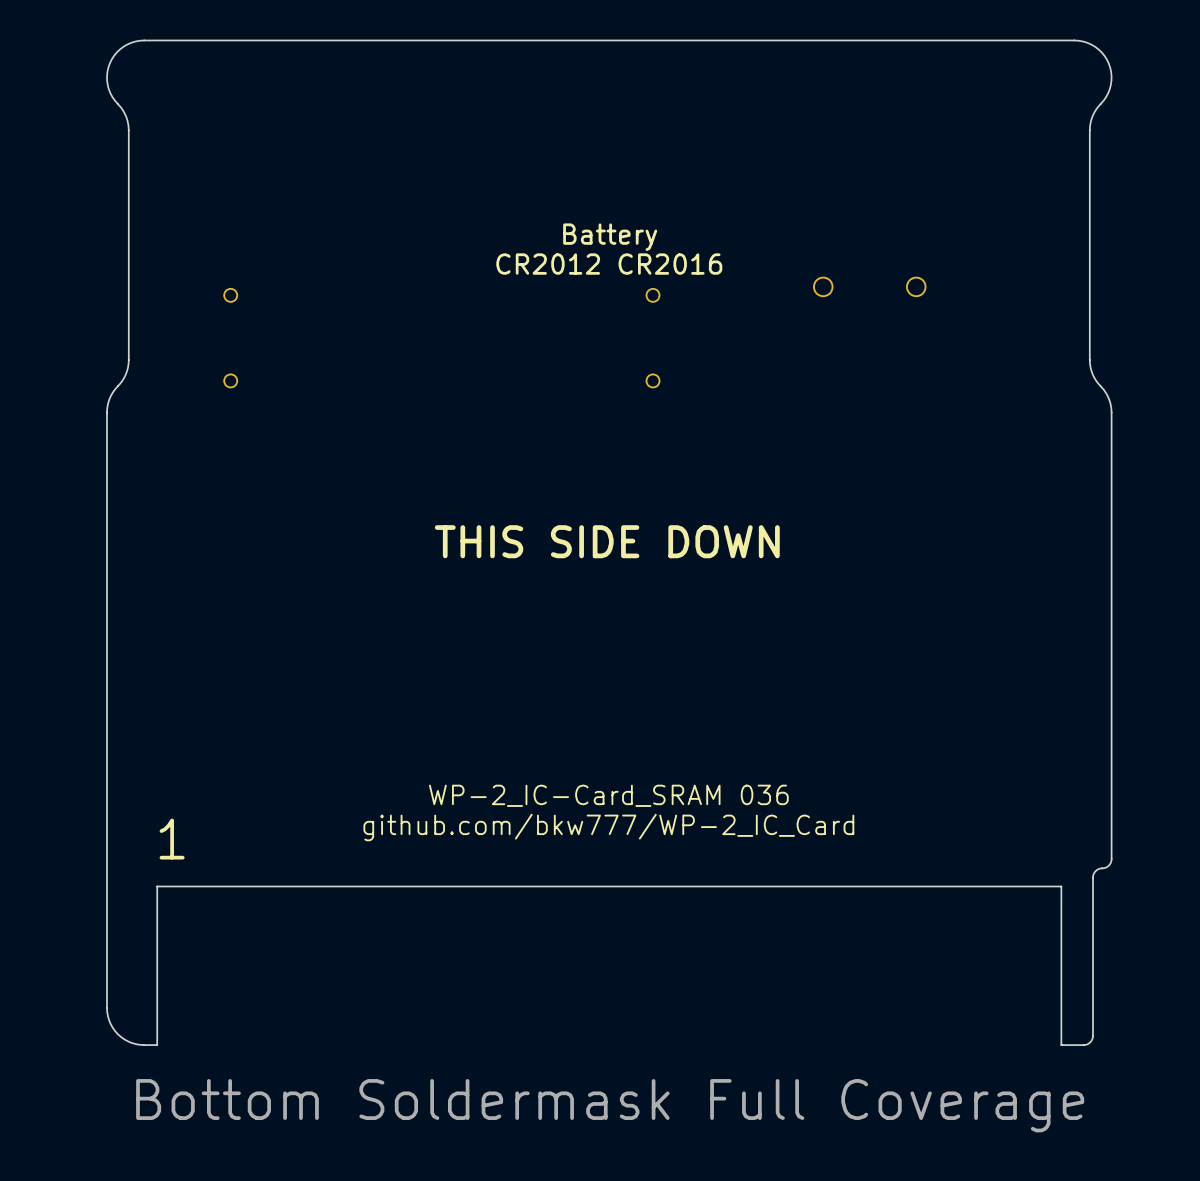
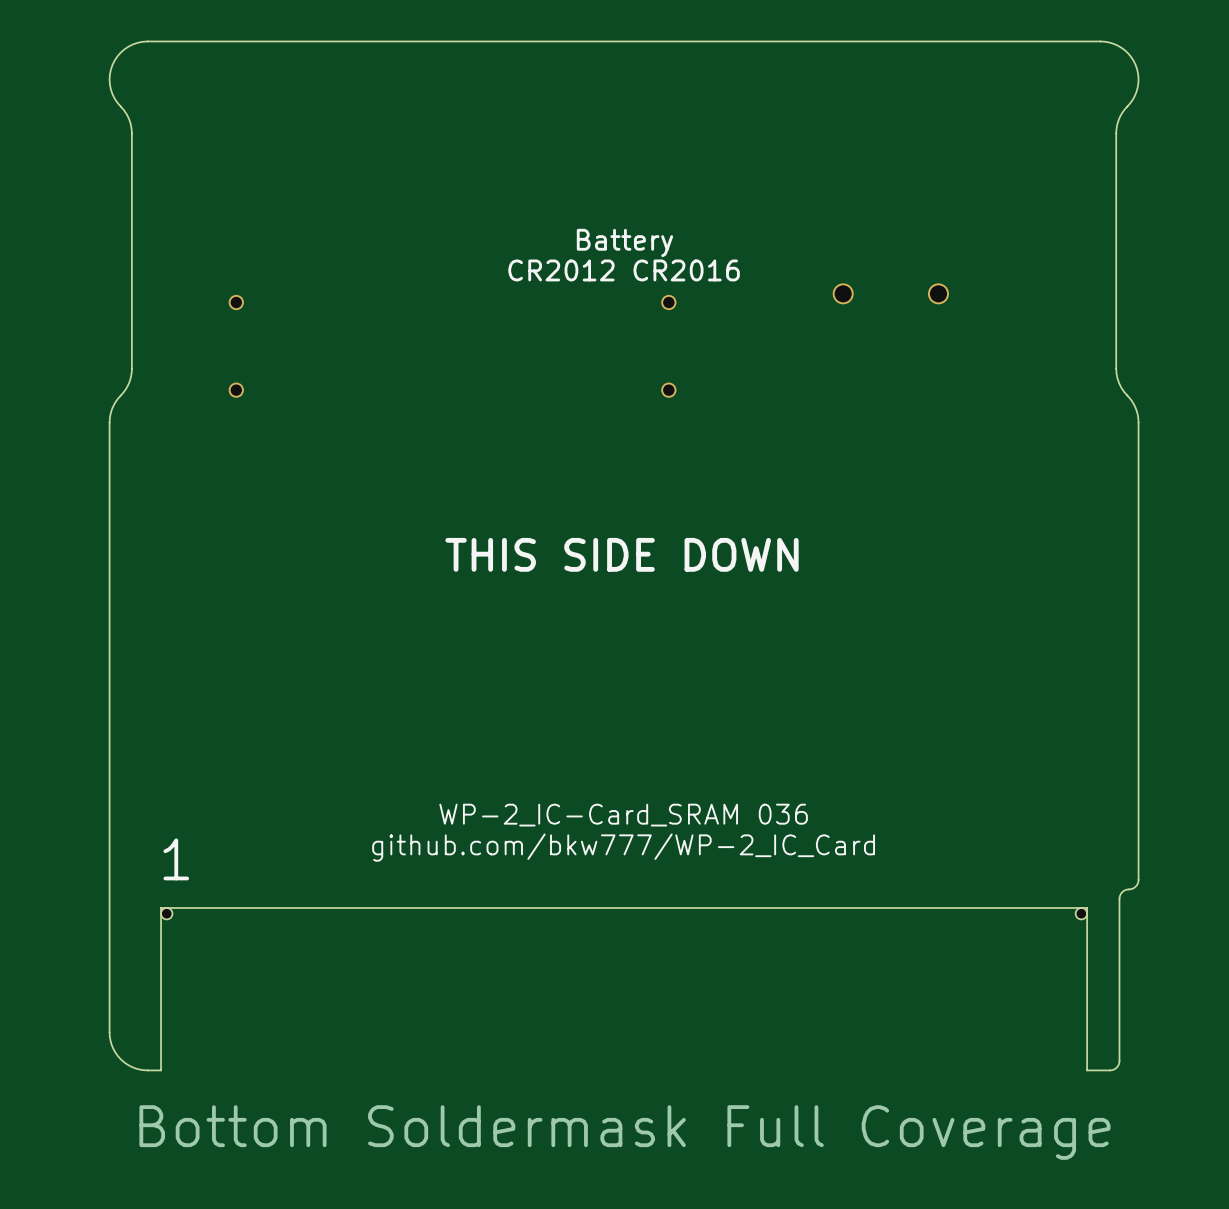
board edge: none -> (1100, 41) (147, 41) (133, 44) (120, 52) (112, 64) (109, 79) (112, 94) (126, 114) (131, 128) (131, 368) (129, 383) (114, 403) (109, 422) (109, 1032) (111, 1044) (120, 1059) (139, 1069) (161, 1070) (161, 907) (1087, 907) (1087, 1070) (1111, 1070) (1116, 1067) (1119, 1060) (1119, 897) (1123, 891) (1135, 886) (1138, 879) (1138, 422) (1135, 407) (1121, 387) (1116, 373) (1116, 133) (1120, 115) (1135, 95) (1138, 78) (1133, 60) (1125, 50) (1113, 43) (1100, 41)
part: (609, 542) -> none
part: none -> (166, 913)
part: none -> (1081, 913)

